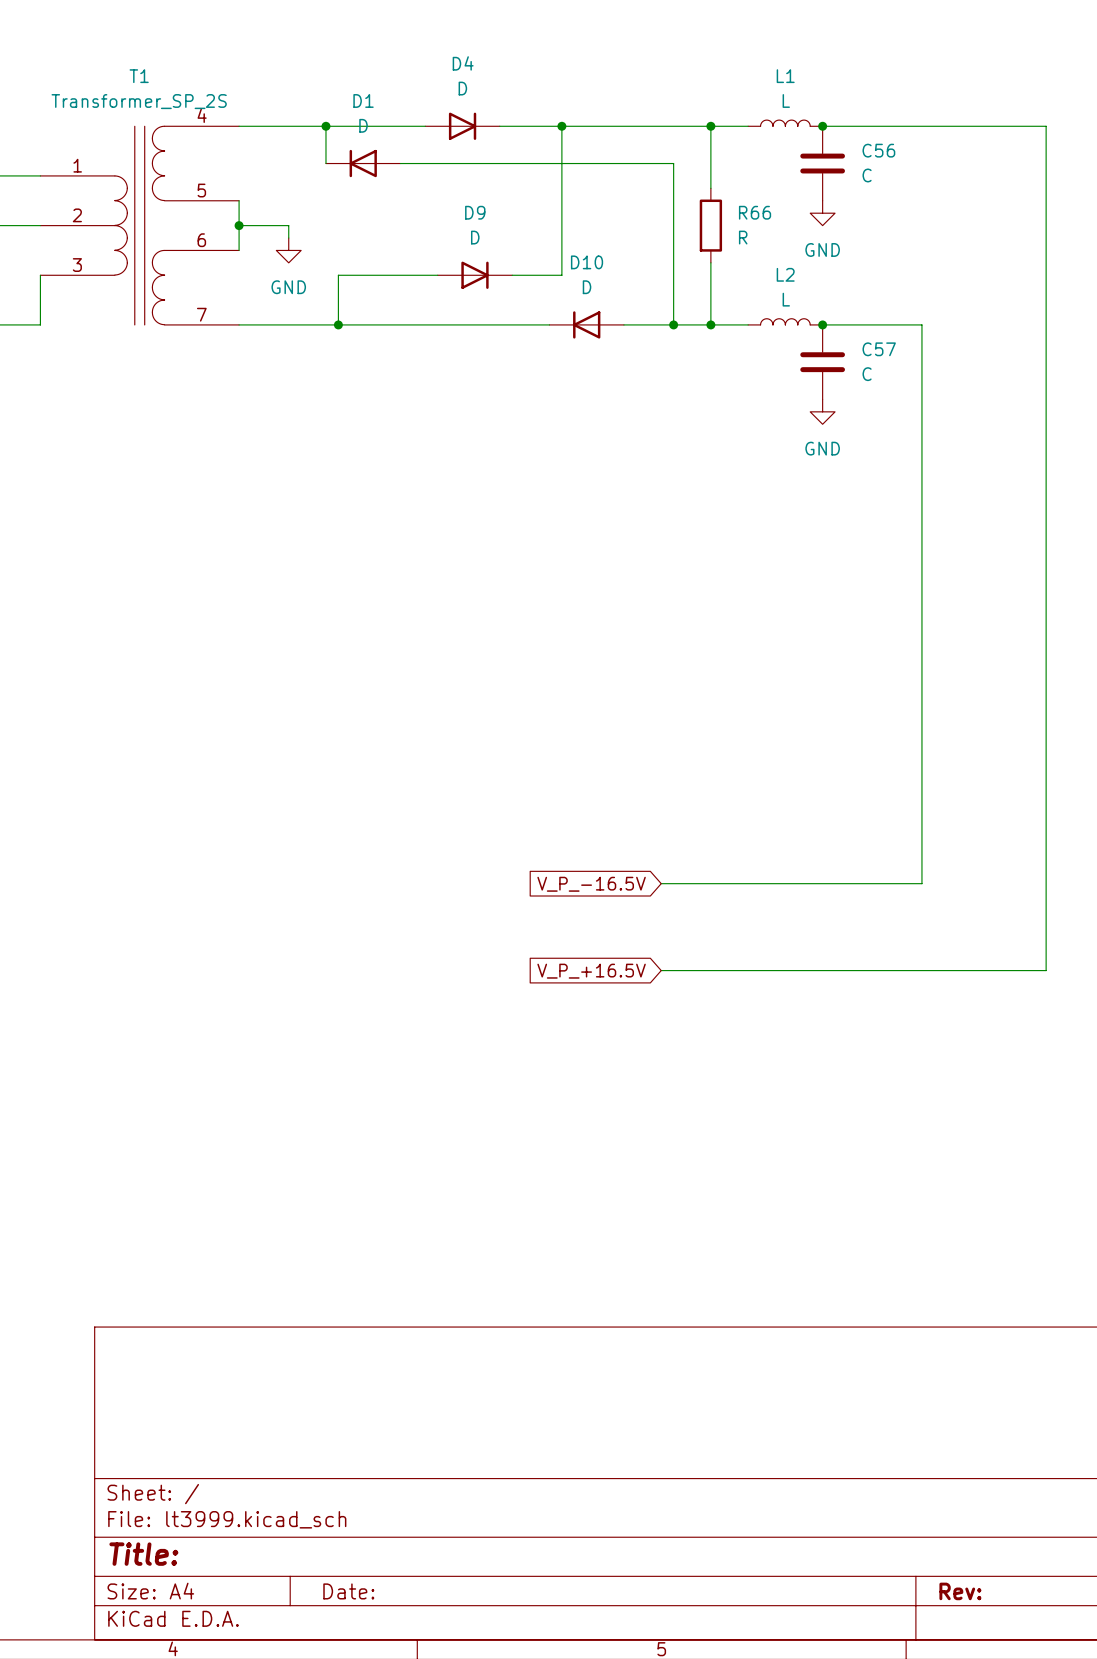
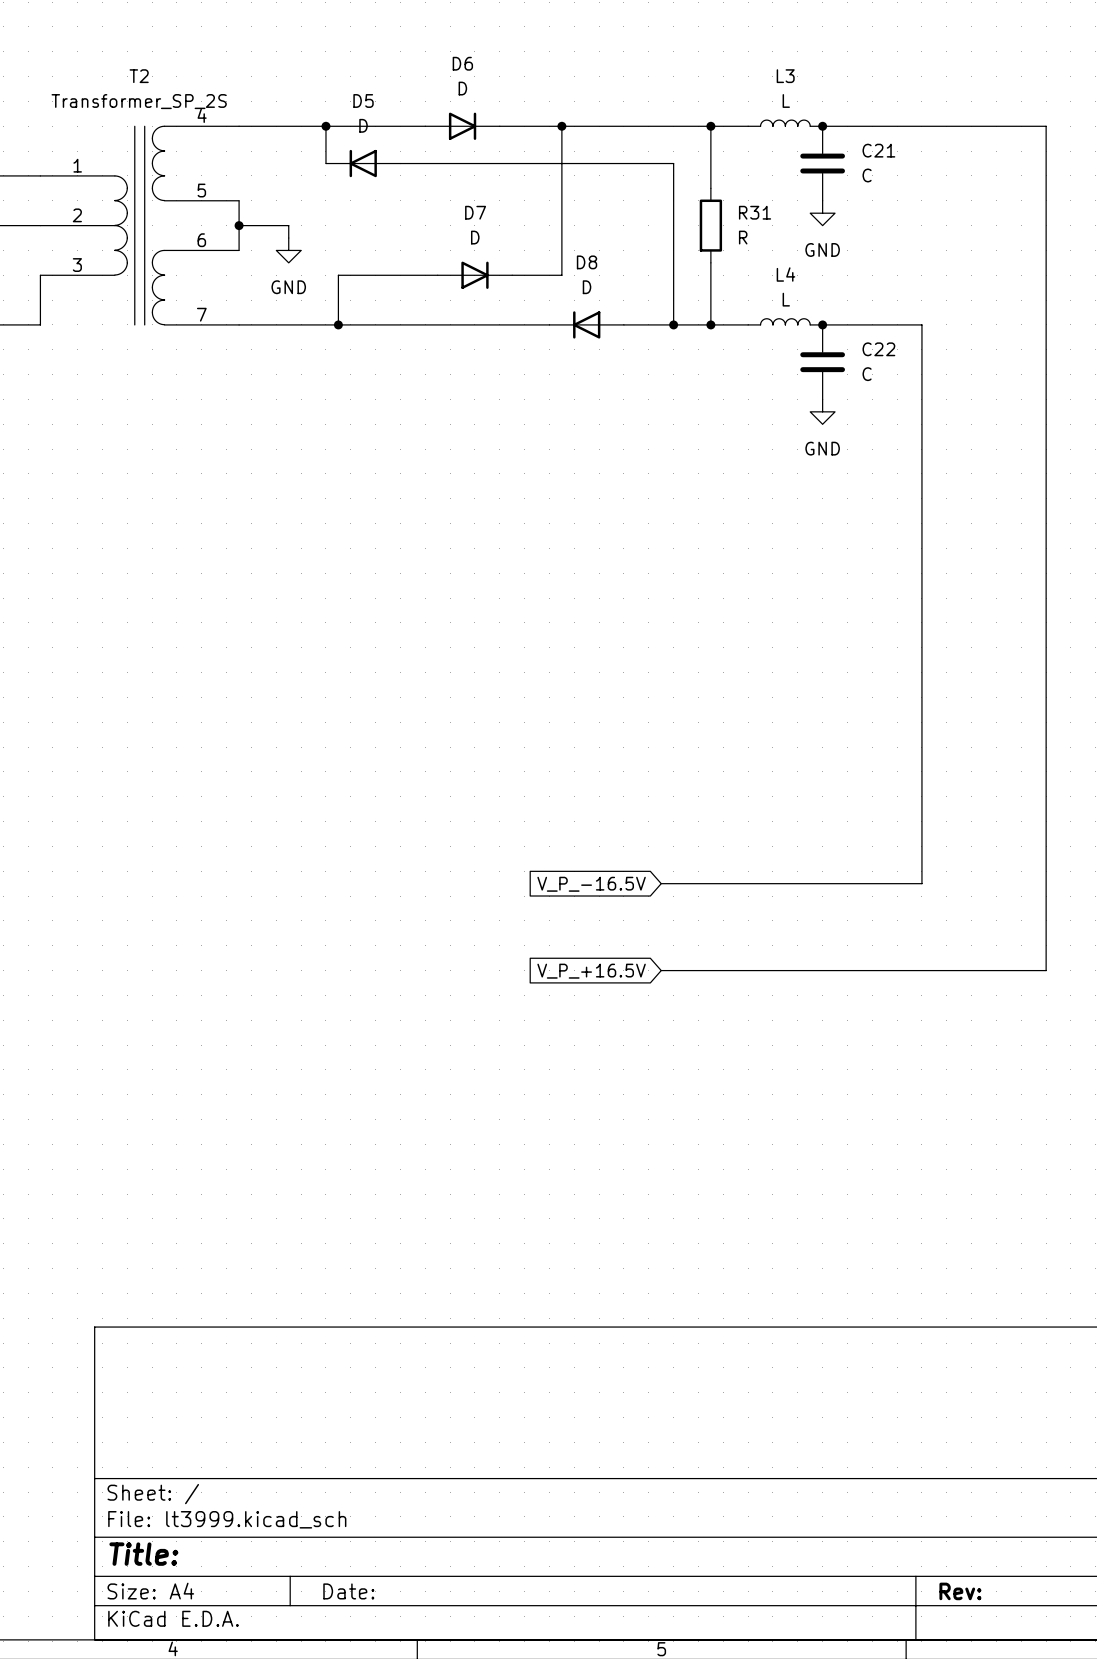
D4 name: D4 (463, 63) -> D6 (462, 63)
T1 name: T1 (139, 76) -> T2 (139, 76)
L1 name: L1 (785, 76) -> L3 (785, 76)
D1 name: D1 (363, 100) -> D5 (363, 100)
C56 name: C56 (878, 150) -> C21 (878, 150)
D9 name: D9 (475, 212) -> D7 (475, 212)
R66 name: R66 (755, 212) -> R31 (755, 212)
D10 name: D10 (587, 262) -> D8 (587, 262)
L2 name: L2 (785, 274) -> L4 (785, 274)
C57 name: C57 (879, 349) -> C22 (878, 349)

